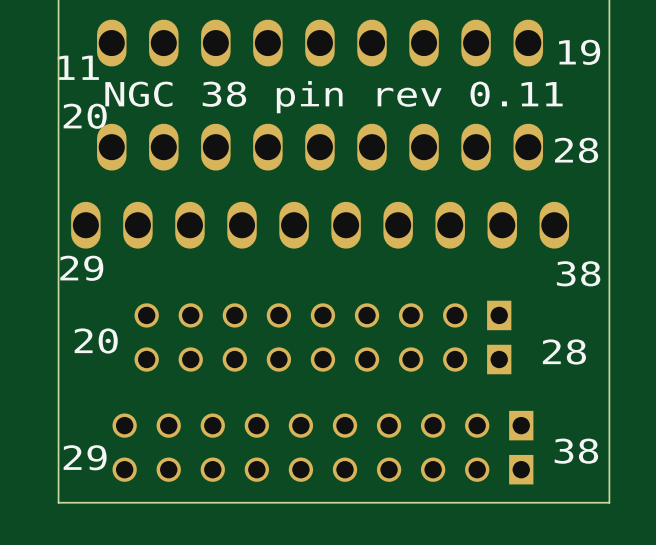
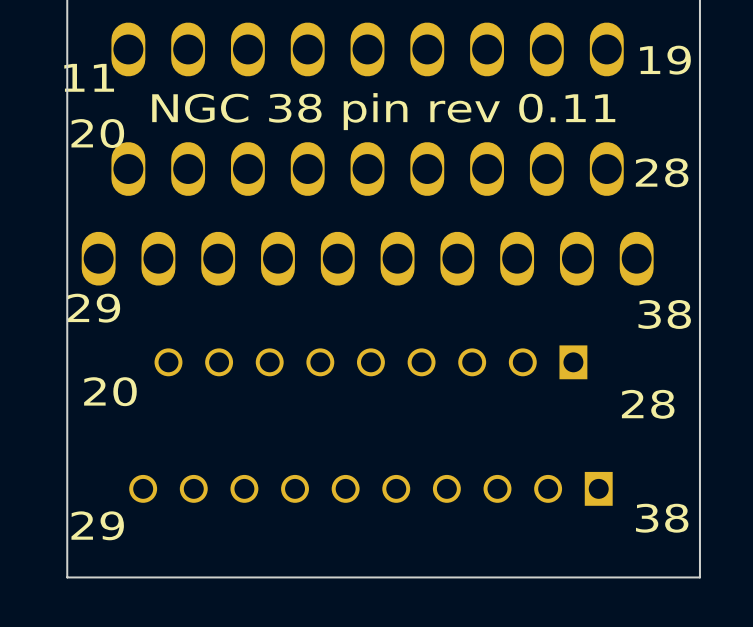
part: (322, 359) -> none
part: (322, 469) -> none

